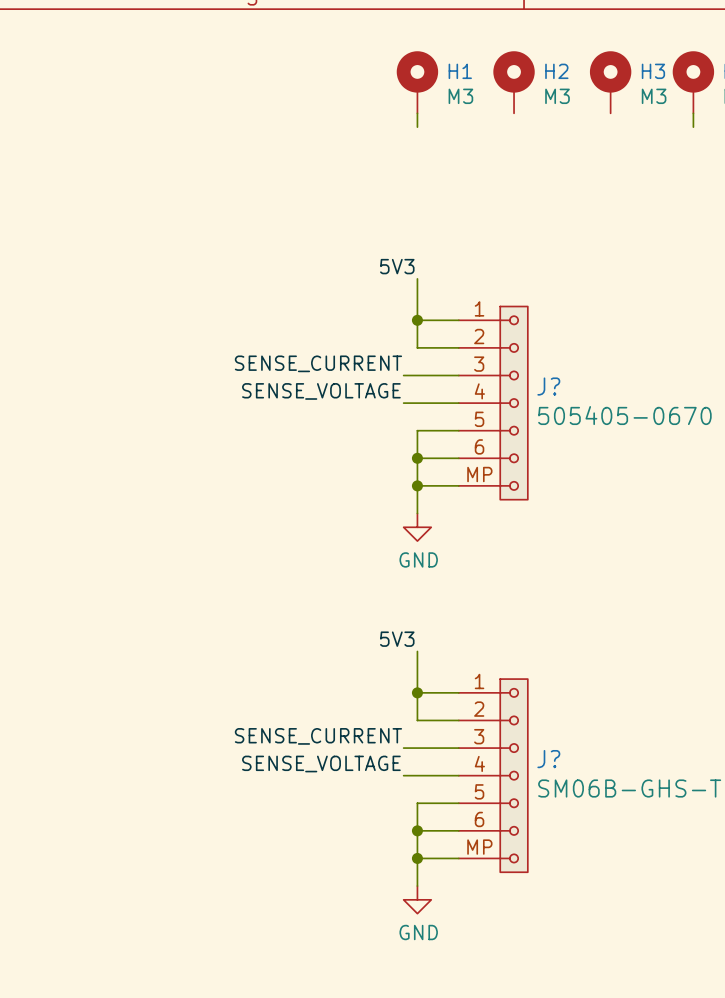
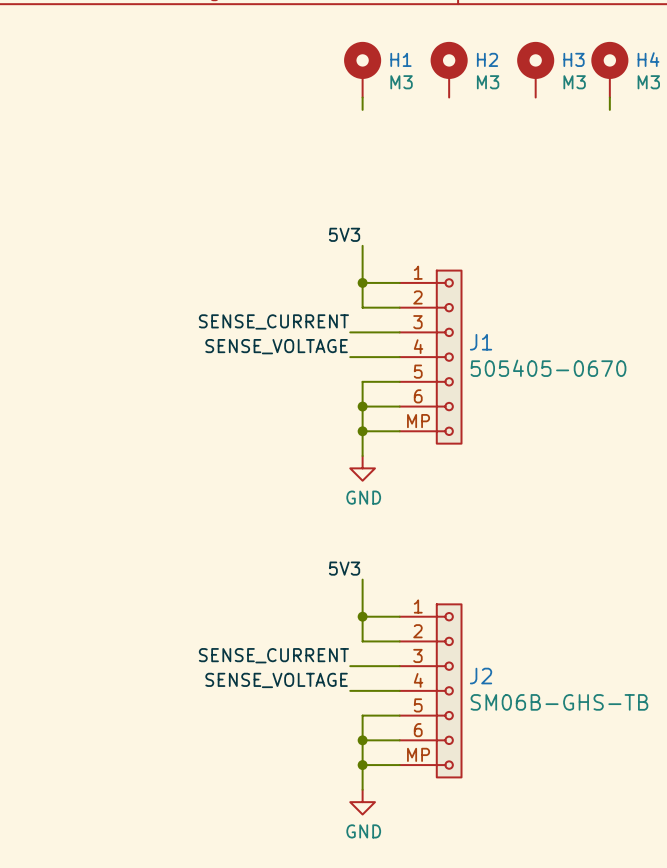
J? name: J? (548, 386) -> J1 (481, 342)
J? name: J? (548, 759) -> J2 (481, 676)

